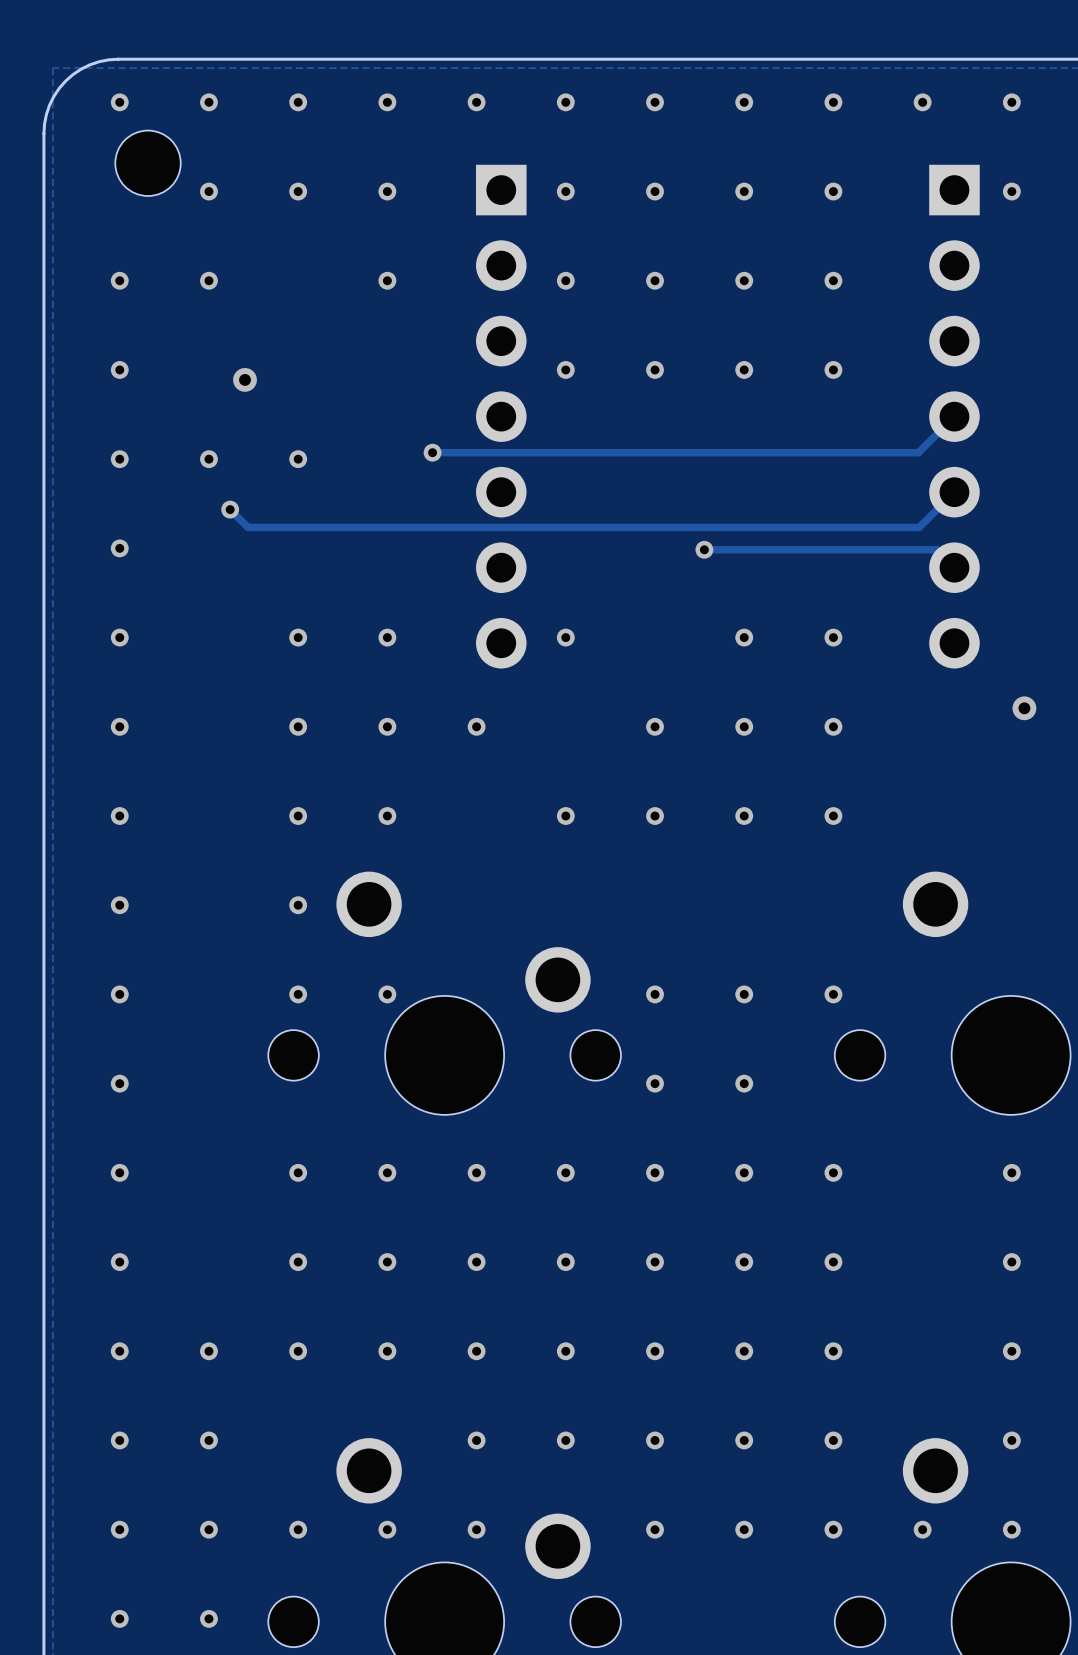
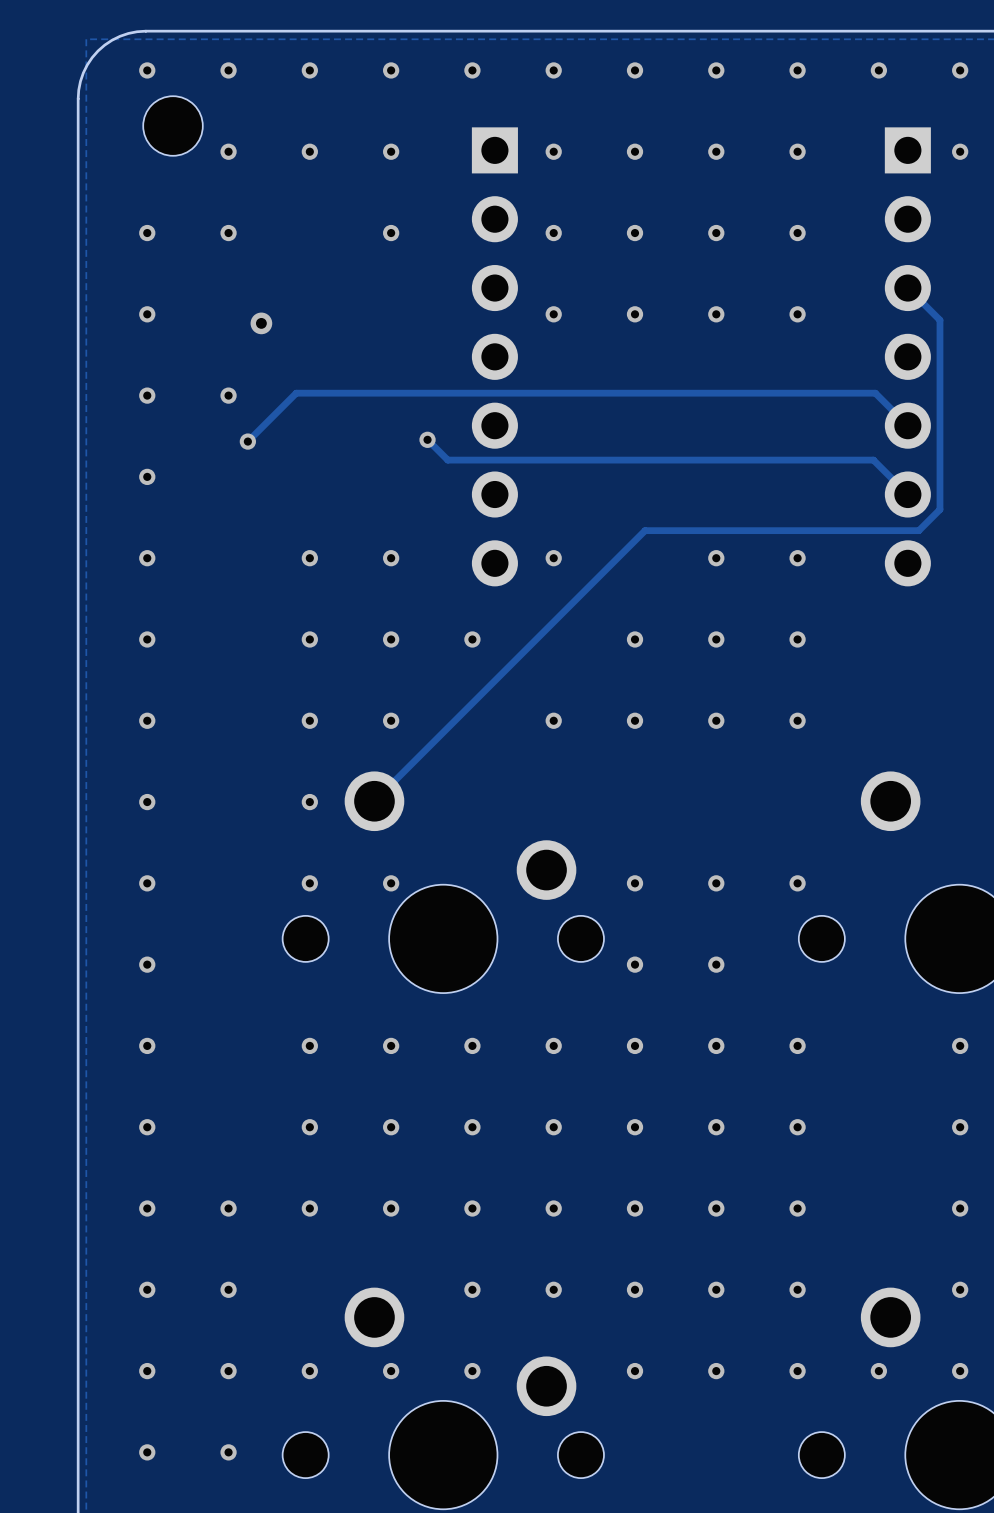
track: none -> (907, 288) (939, 320) (939, 509) (918, 530) (645, 530) (374, 801)
track: (954, 416) (918, 452) (432, 452) -> none
via position: (432, 452) -> (427, 439)
via: (298, 459) -> none
track: (954, 492) (919, 527) (247, 527) (230, 509) -> (907, 425) (875, 393) (296, 393) (247, 441)
via: (704, 549) -> none
track: (936, 549) (704, 549) -> (891, 478) (873, 460) (447, 460) (427, 439)
via: (1024, 708) -> none

